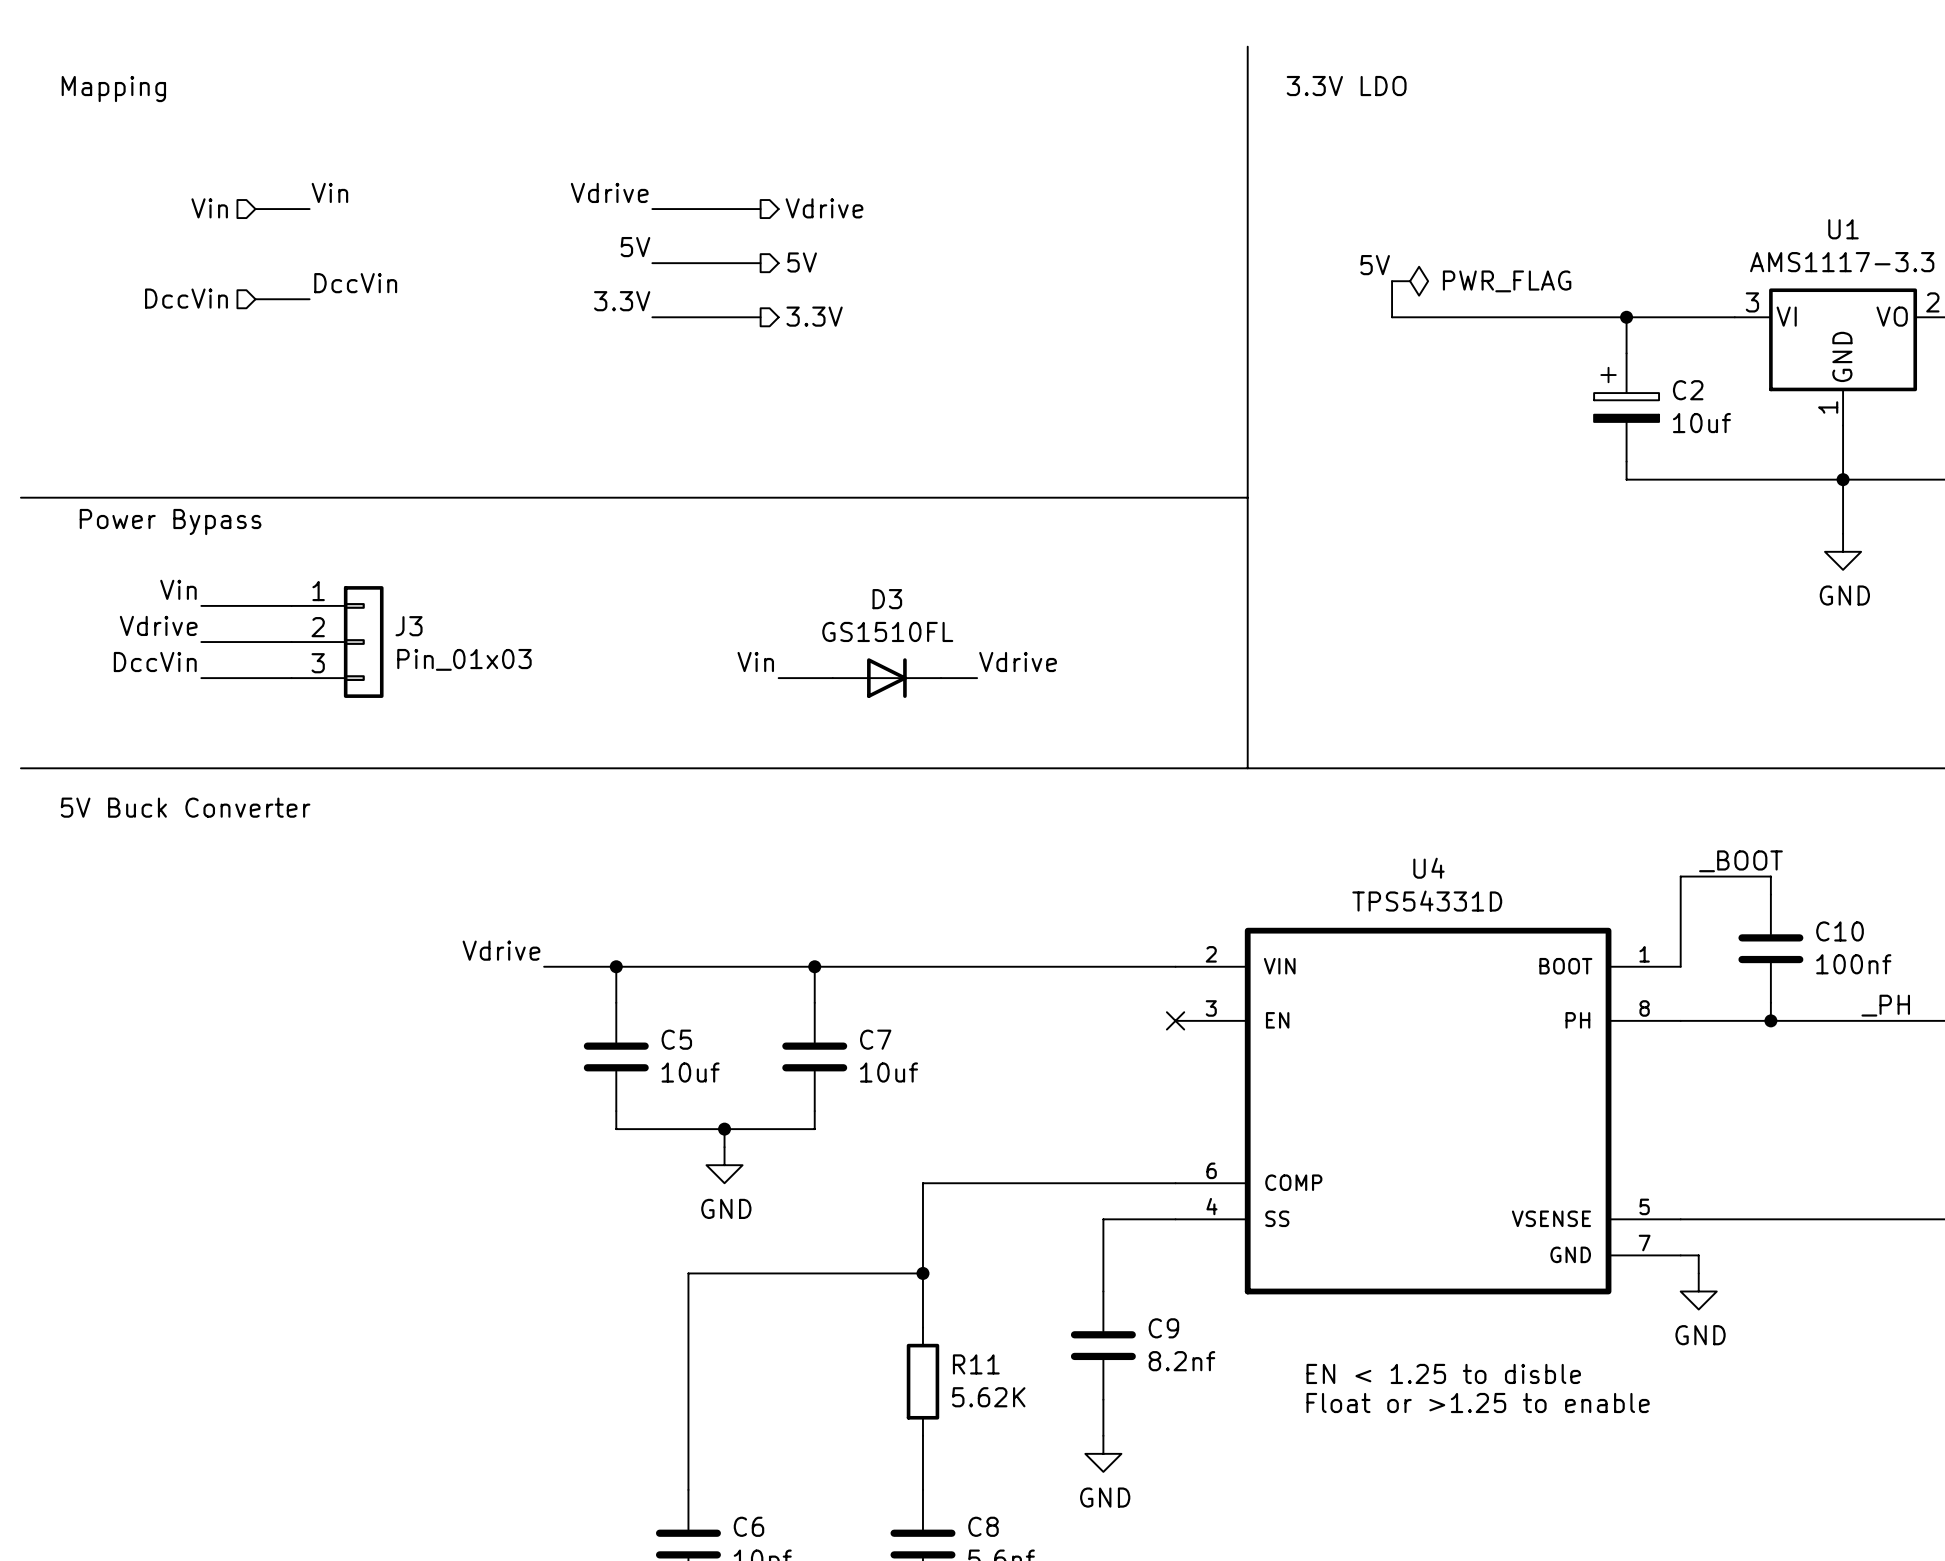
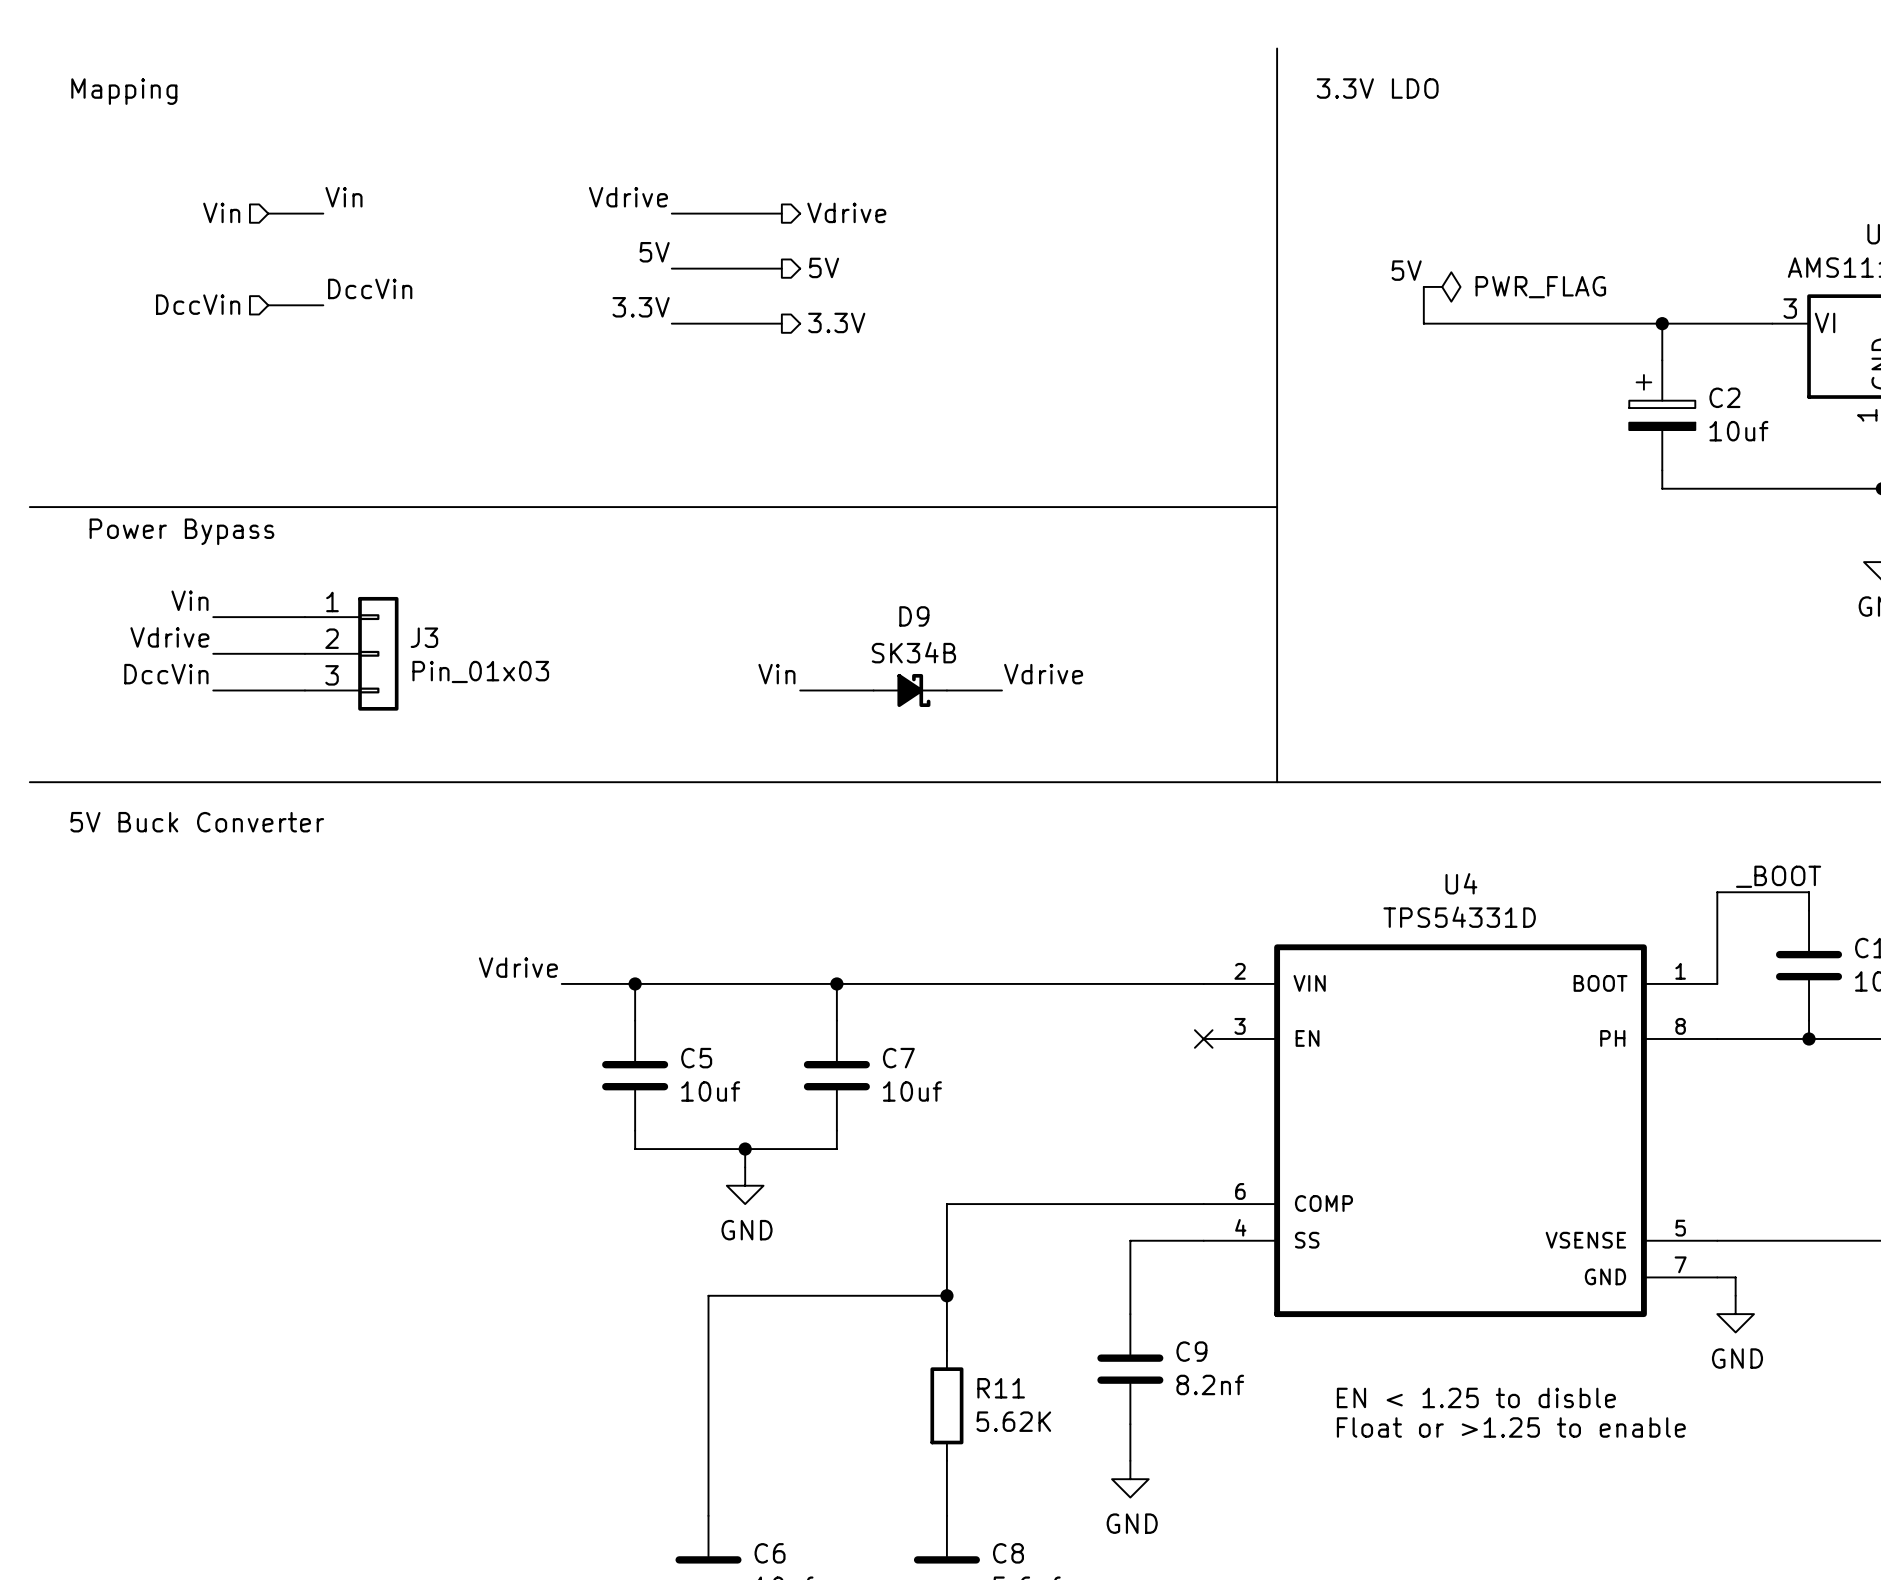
D3: GS1510FL (886, 678) -> none
D9: none -> SK34B (910, 690)

